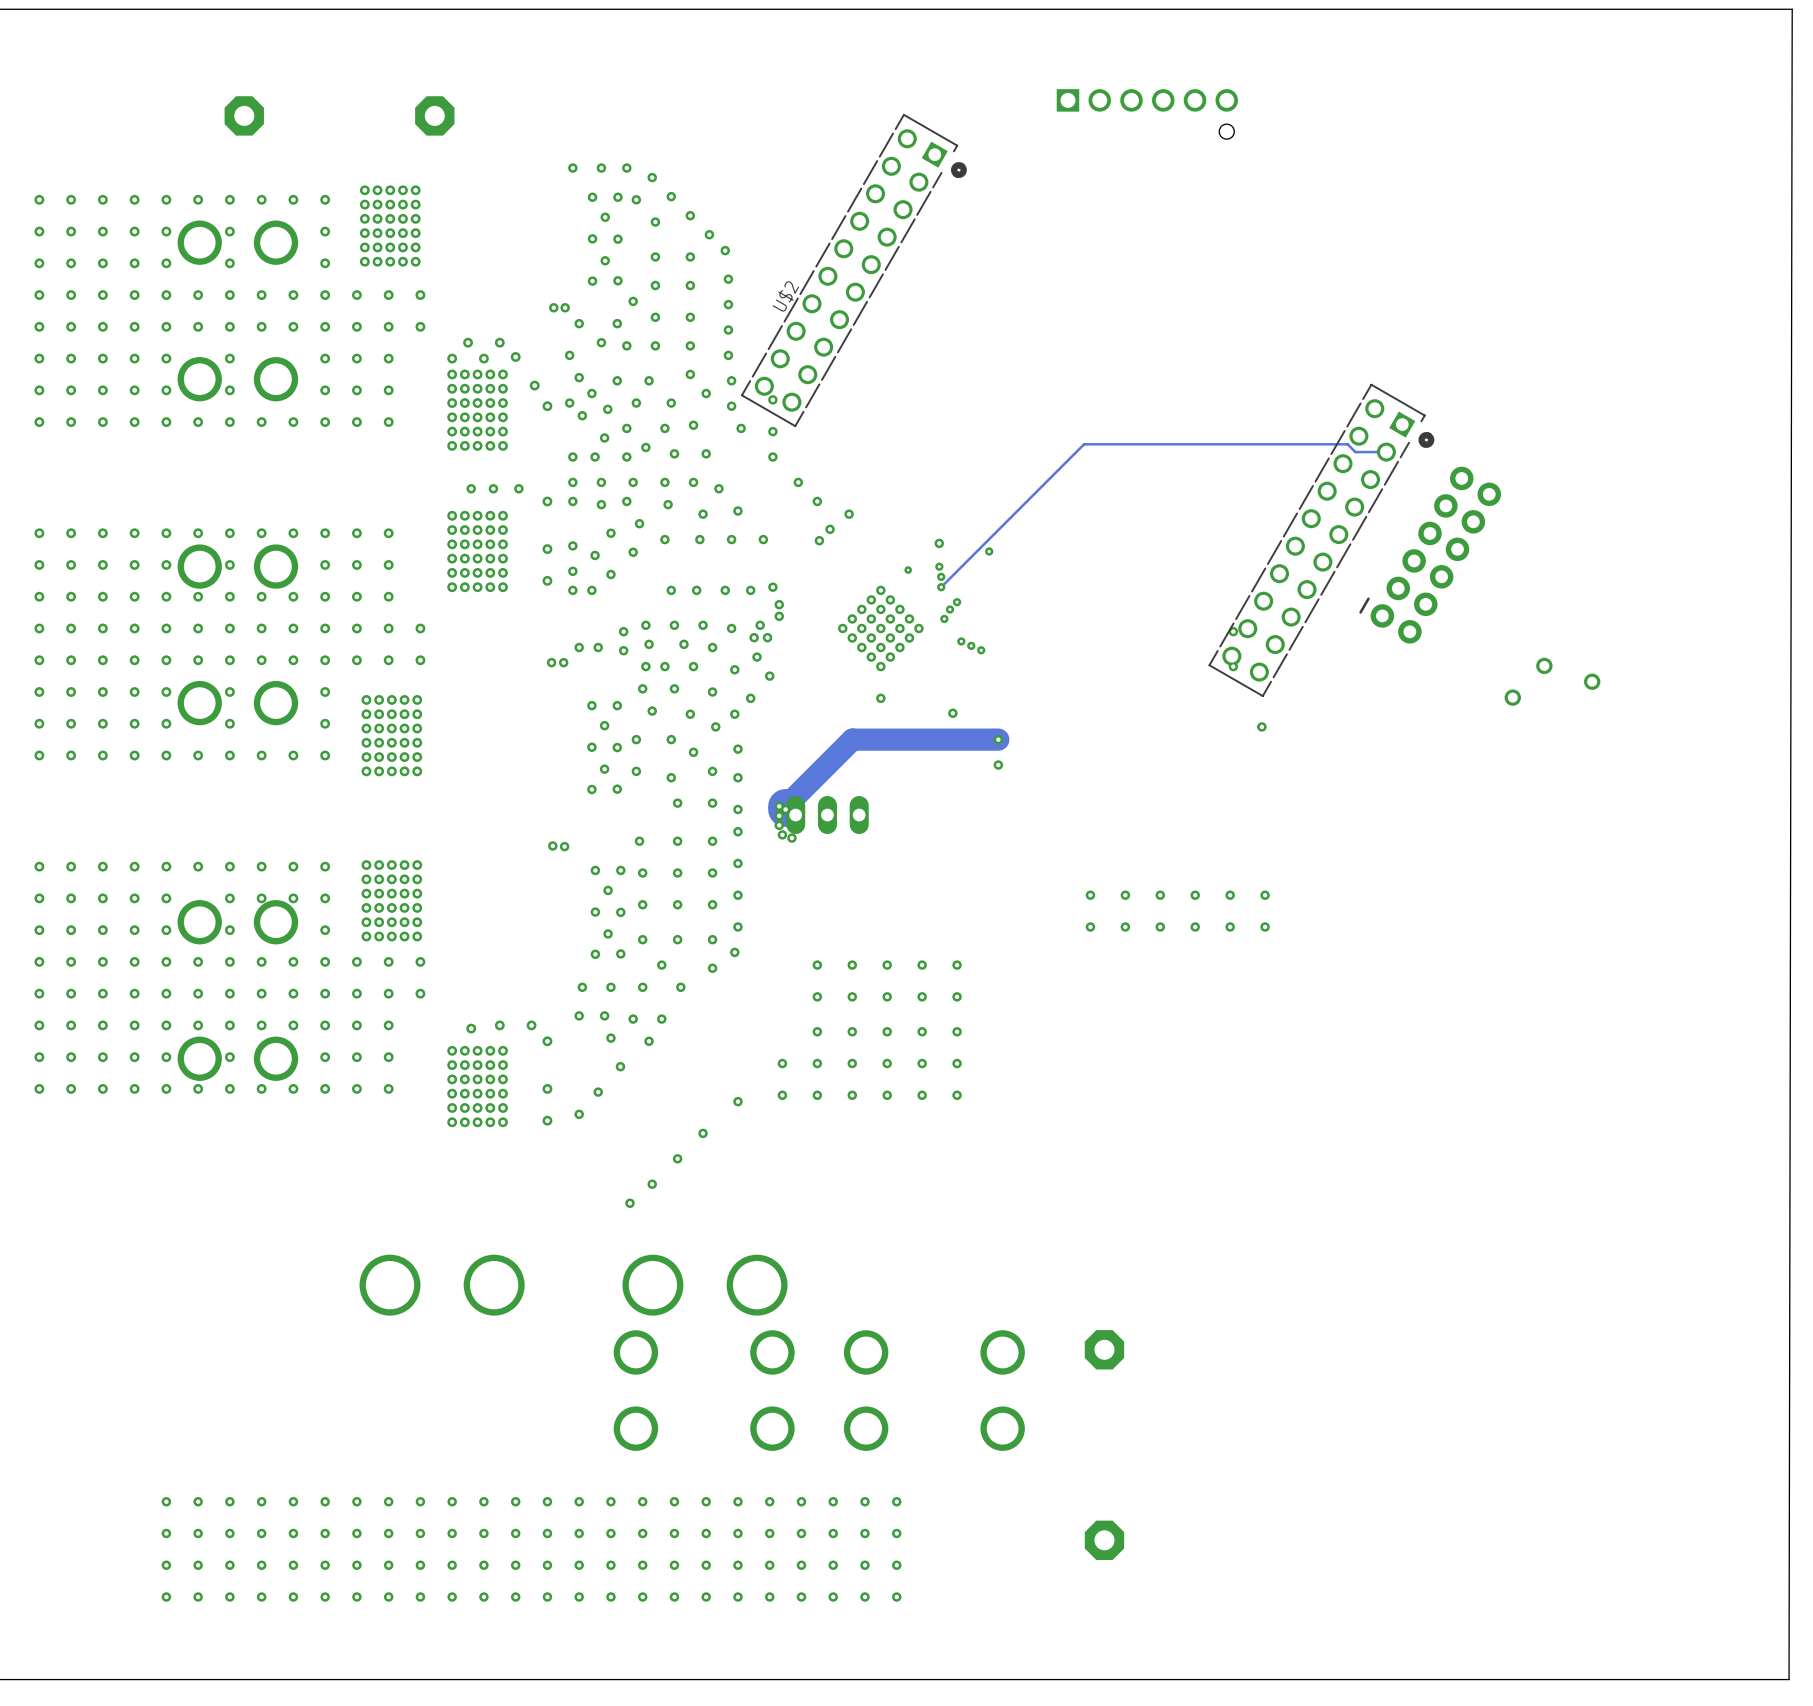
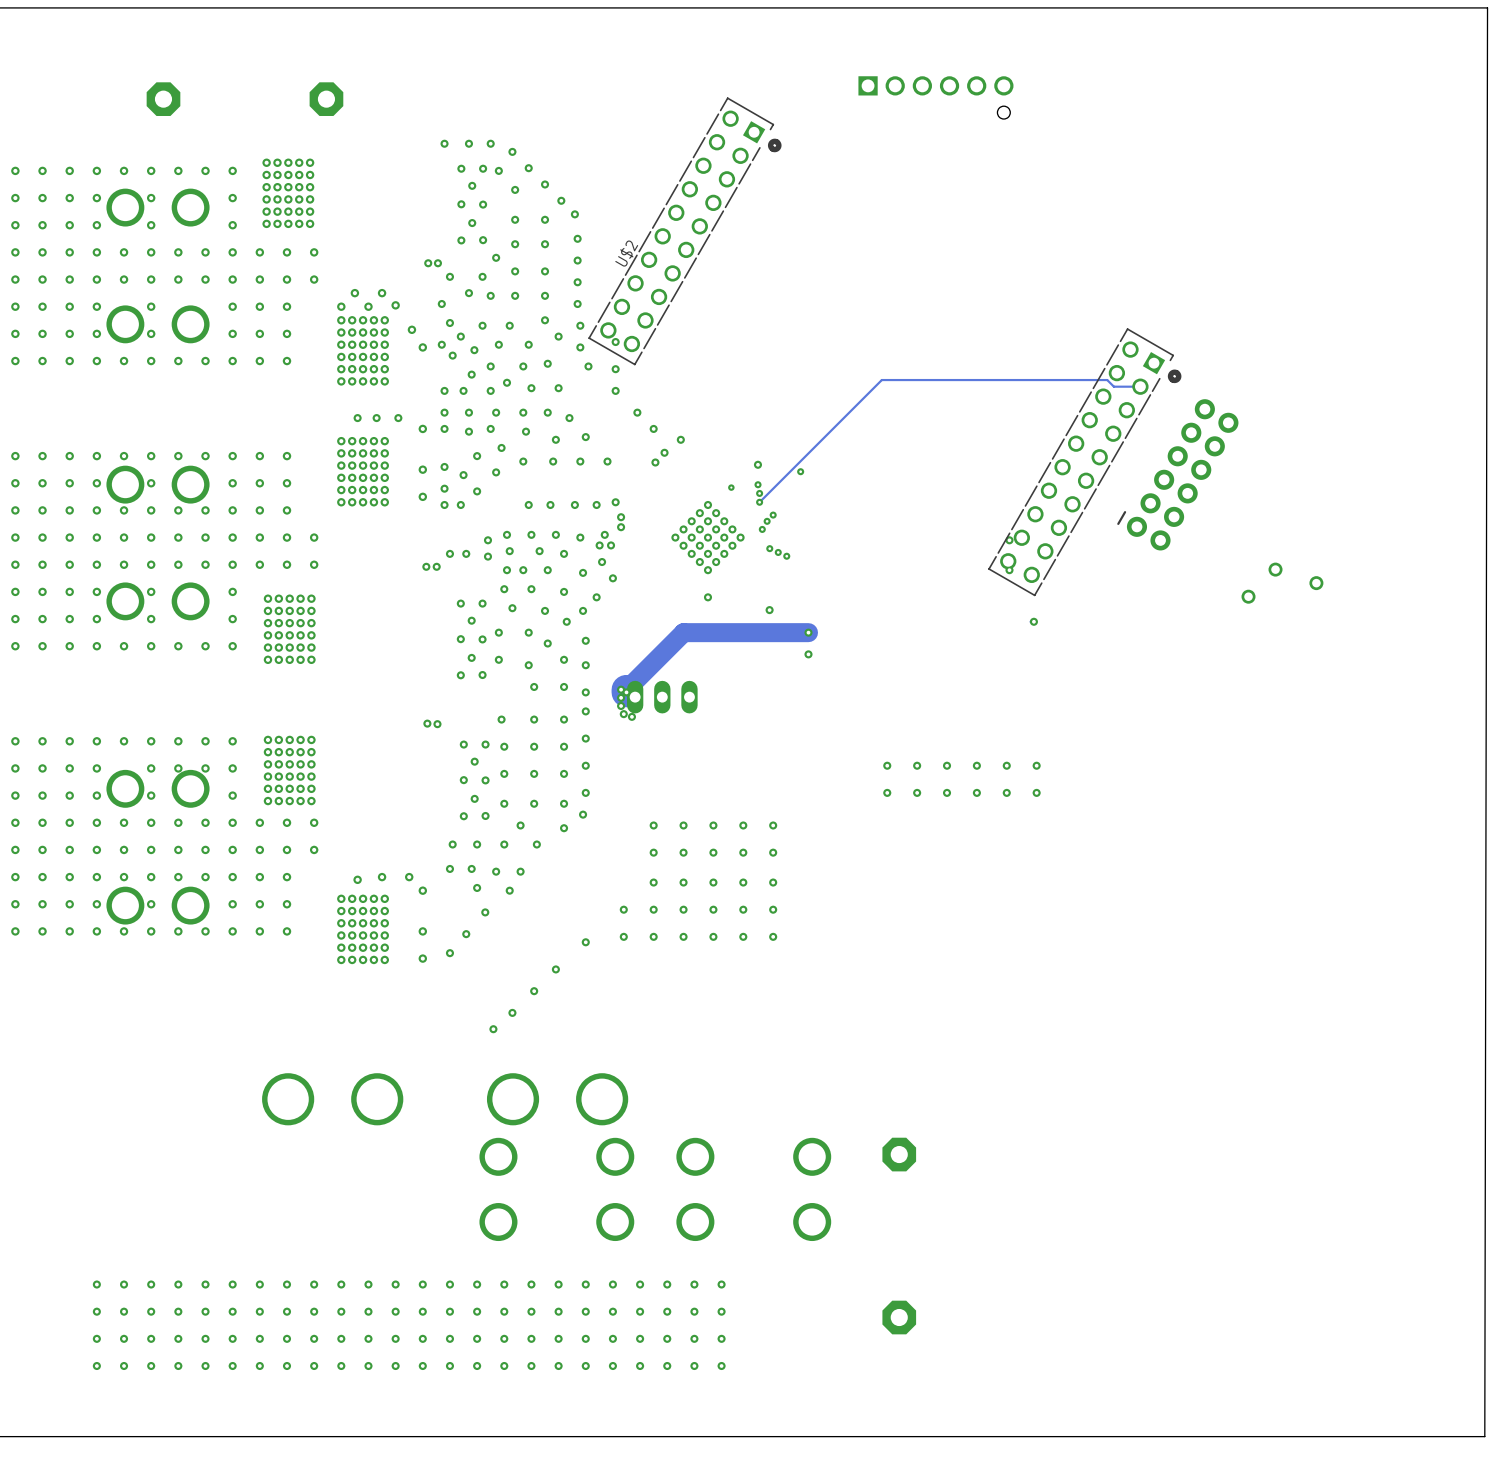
via: none -> (769, 548)
via: (961, 641) -> none
via: none -> (778, 552)
via: (971, 645) -> none
via: none -> (786, 556)
via: (981, 650) -> none

